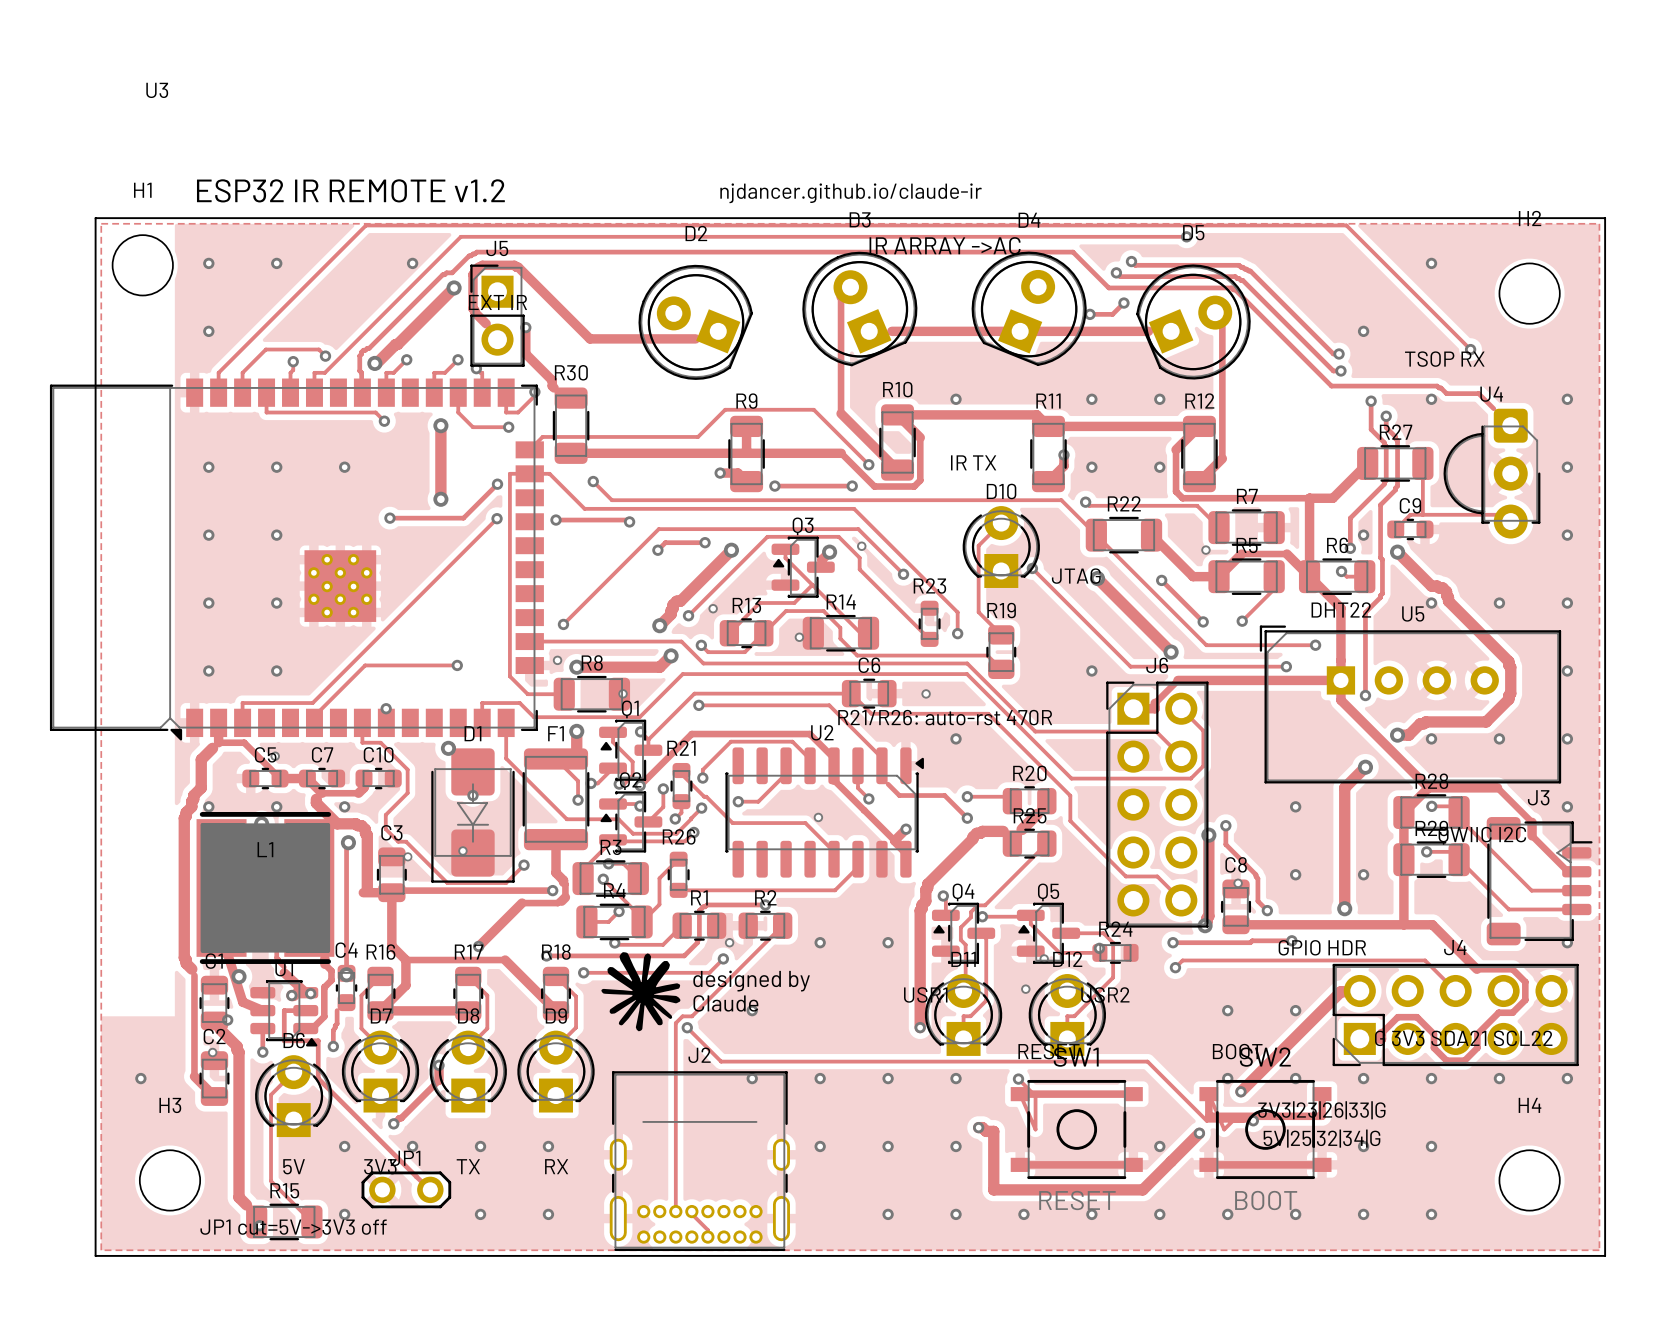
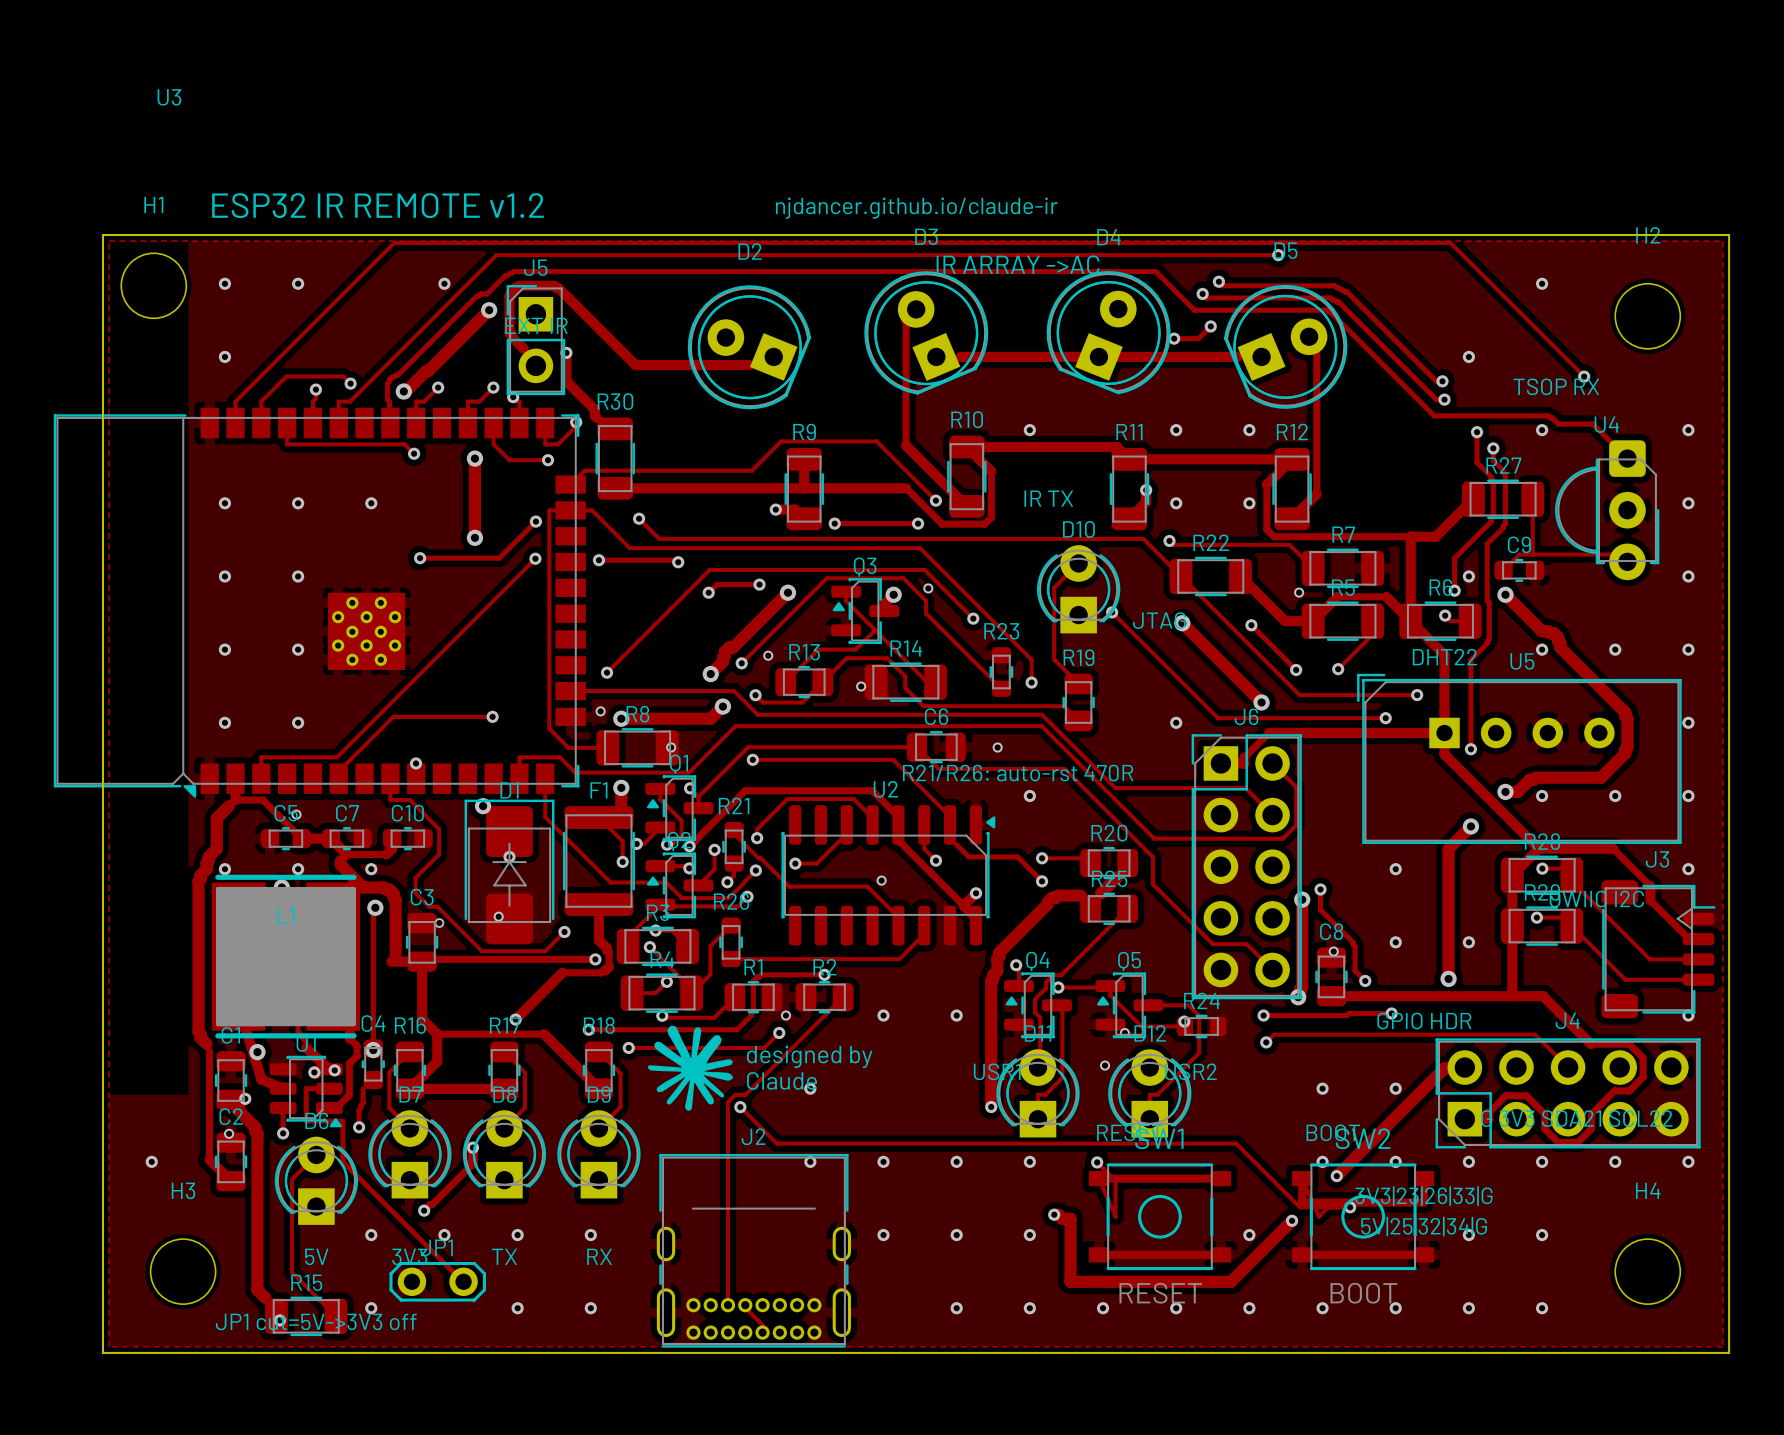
D1 rotation: 0° (472, 815) -> 180° (509, 872)

